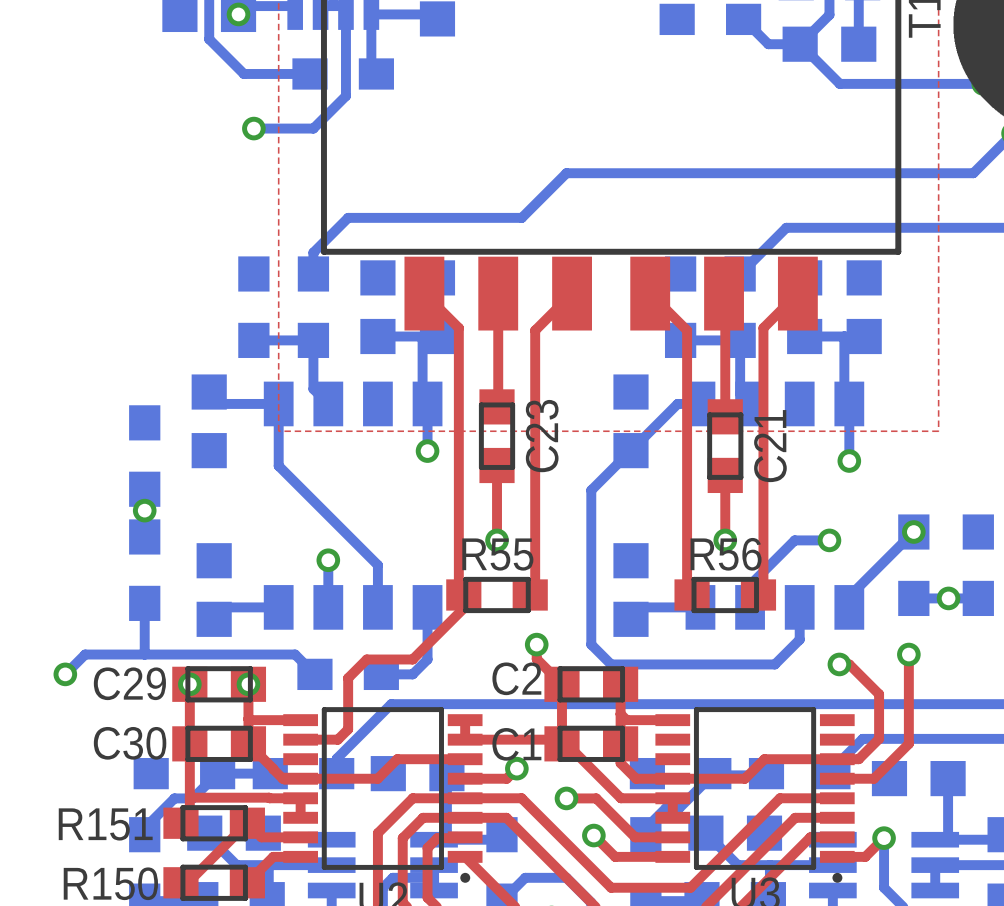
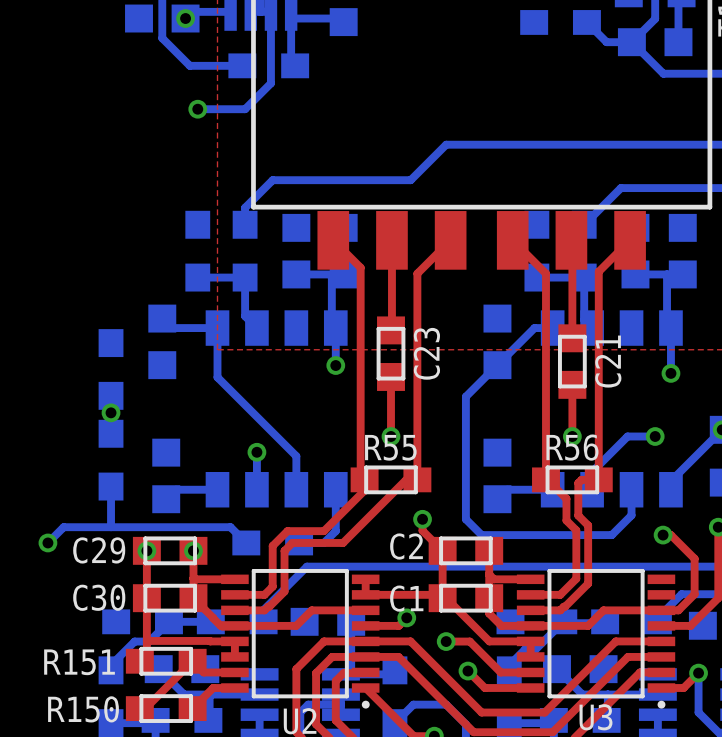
top track: (763, 328) (763, 590) (758, 594) -> (602, 267) (598, 271) (598, 479) (581, 479) (578, 483) (578, 515) (588, 525) (588, 583) (560, 610) (530, 610)
top track: (535, 330) (535, 590) (530, 594) -> (421, 269) (417, 273) (417, 479) (406, 479) (343, 542) (292, 542) (284, 550) (284, 591) (264, 610) (234, 610)
top track: (687, 330) (687, 590) (692, 594) -> (542, 269) (545, 273) (545, 479) (566, 498) (566, 520) (576, 530) (576, 578) (560, 594) (530, 594)

